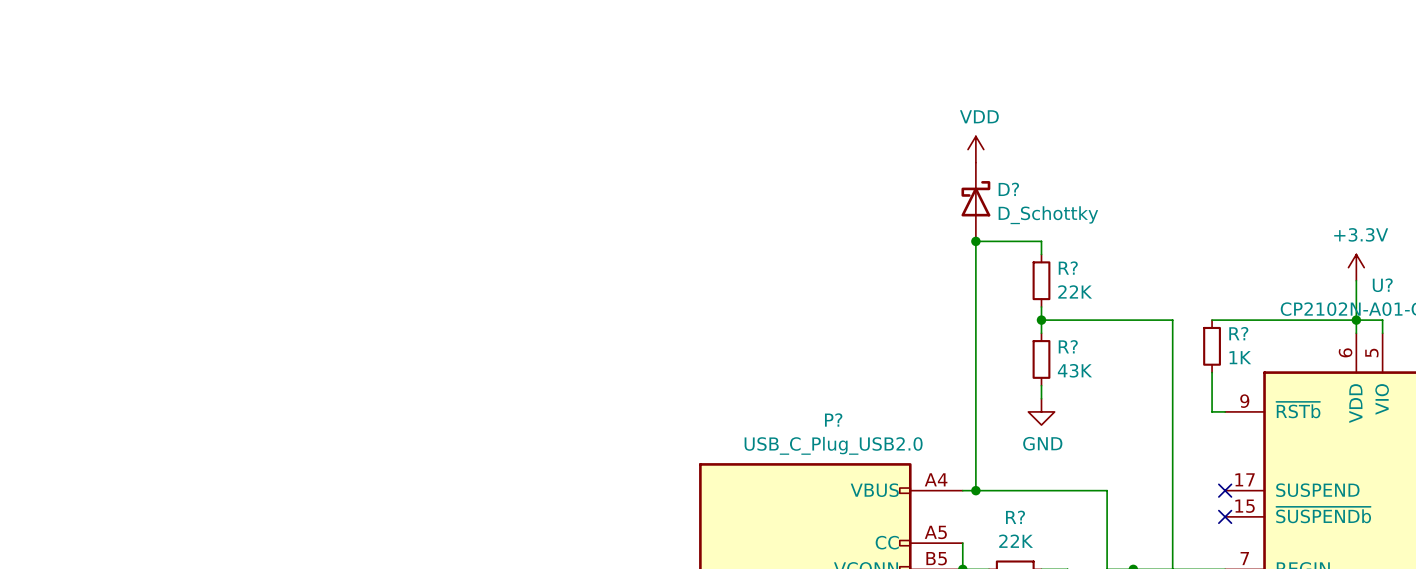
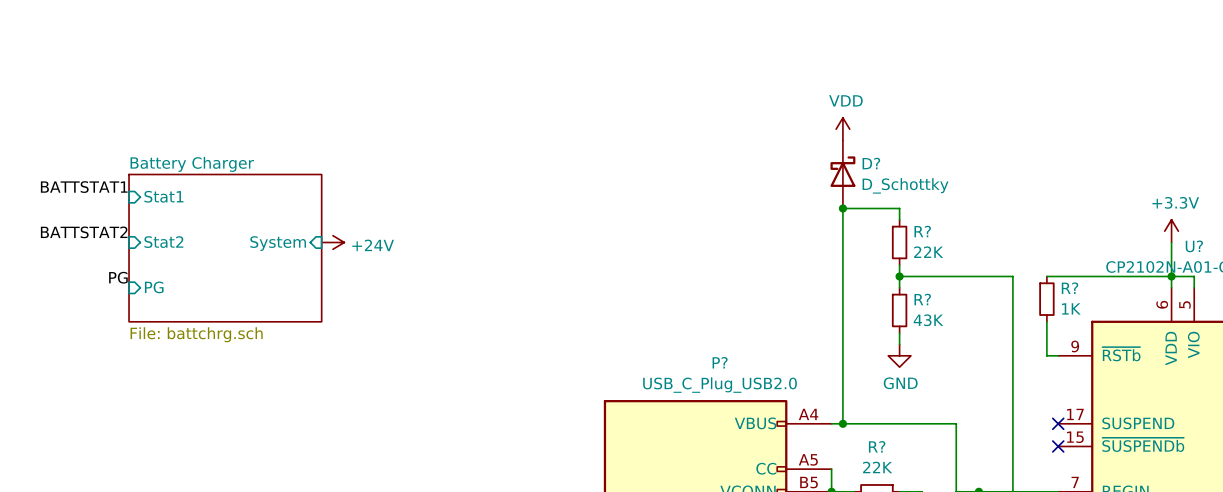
label: none -> BATTSTAT1 (84, 187)
sheet pin: none -> Stat1 (163, 196)
label: none -> BATTSTAT2 (84, 232)
sheet pin: none -> Stat2 (163, 242)
power symbol: none -> +24V (332, 242)
sheet pin: none -> System (278, 243)
sheet Battery Charger: none -> File: battchrg.sch (225, 248)
label: none -> PG (118, 277)
sheet pin: none -> PG (154, 287)

